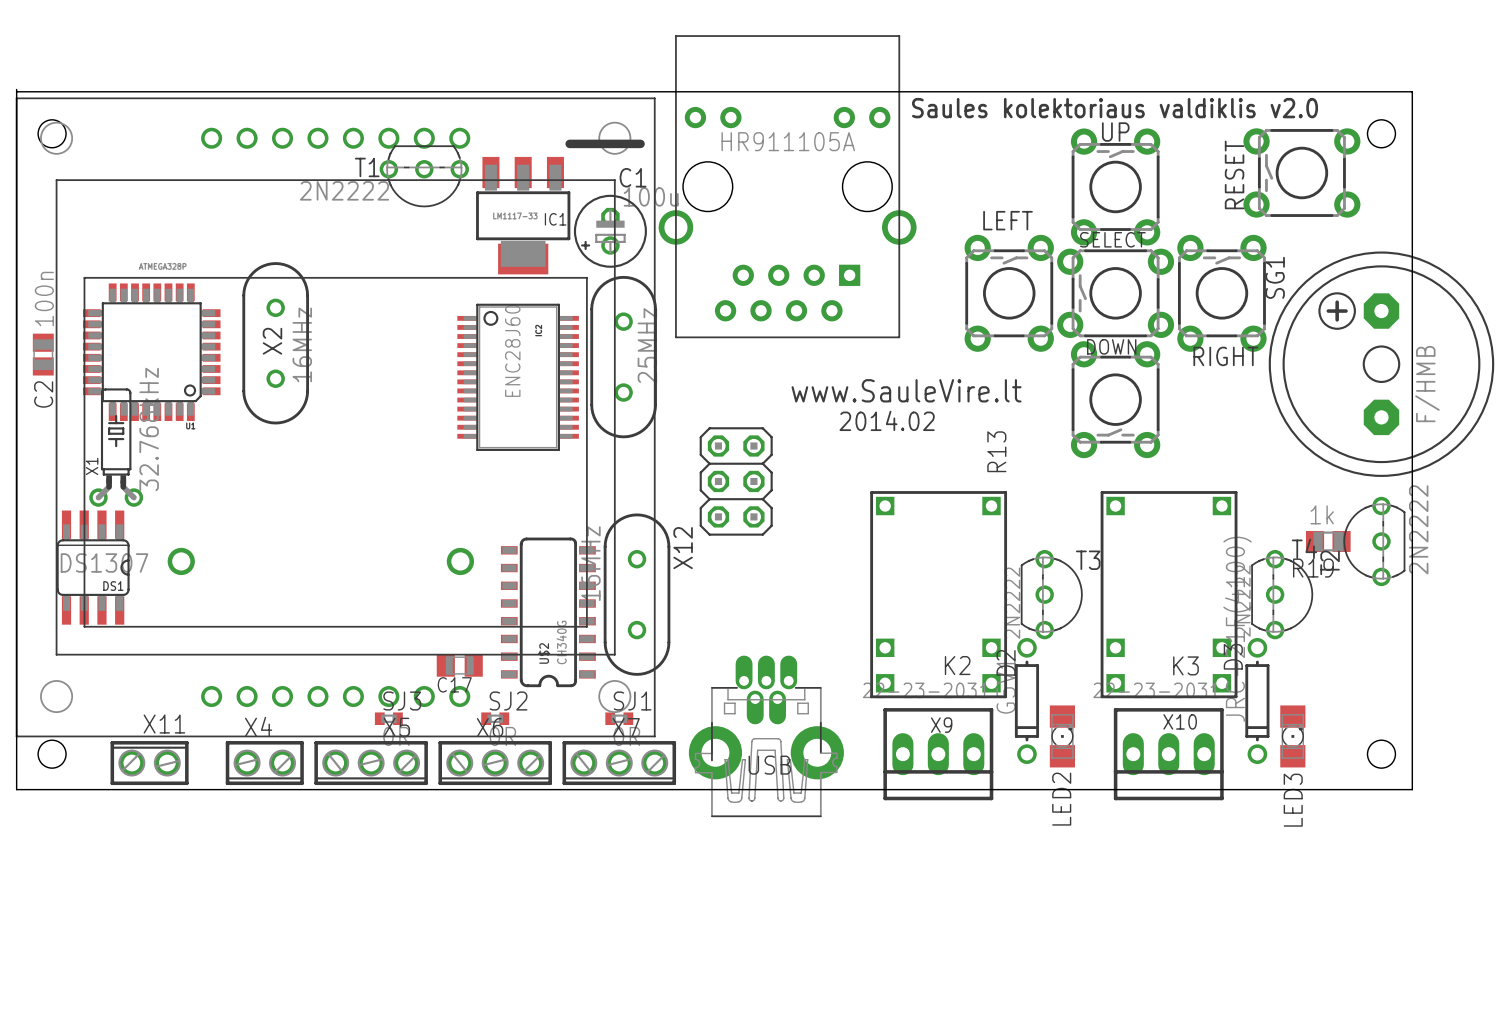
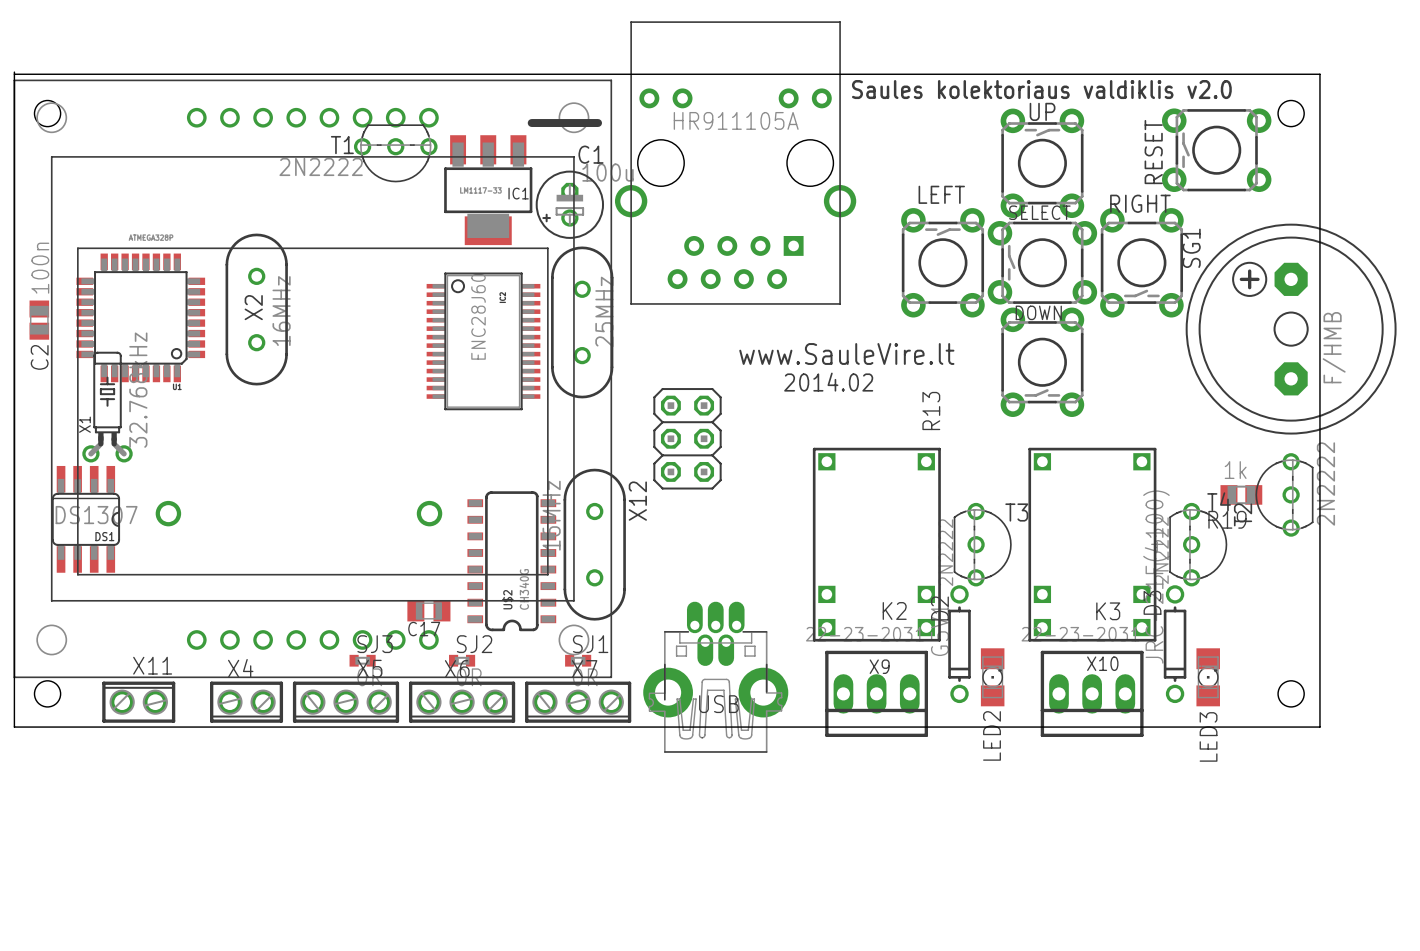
RIGHT rotation: 0° (1221, 293) -> 180° (1141, 262)

